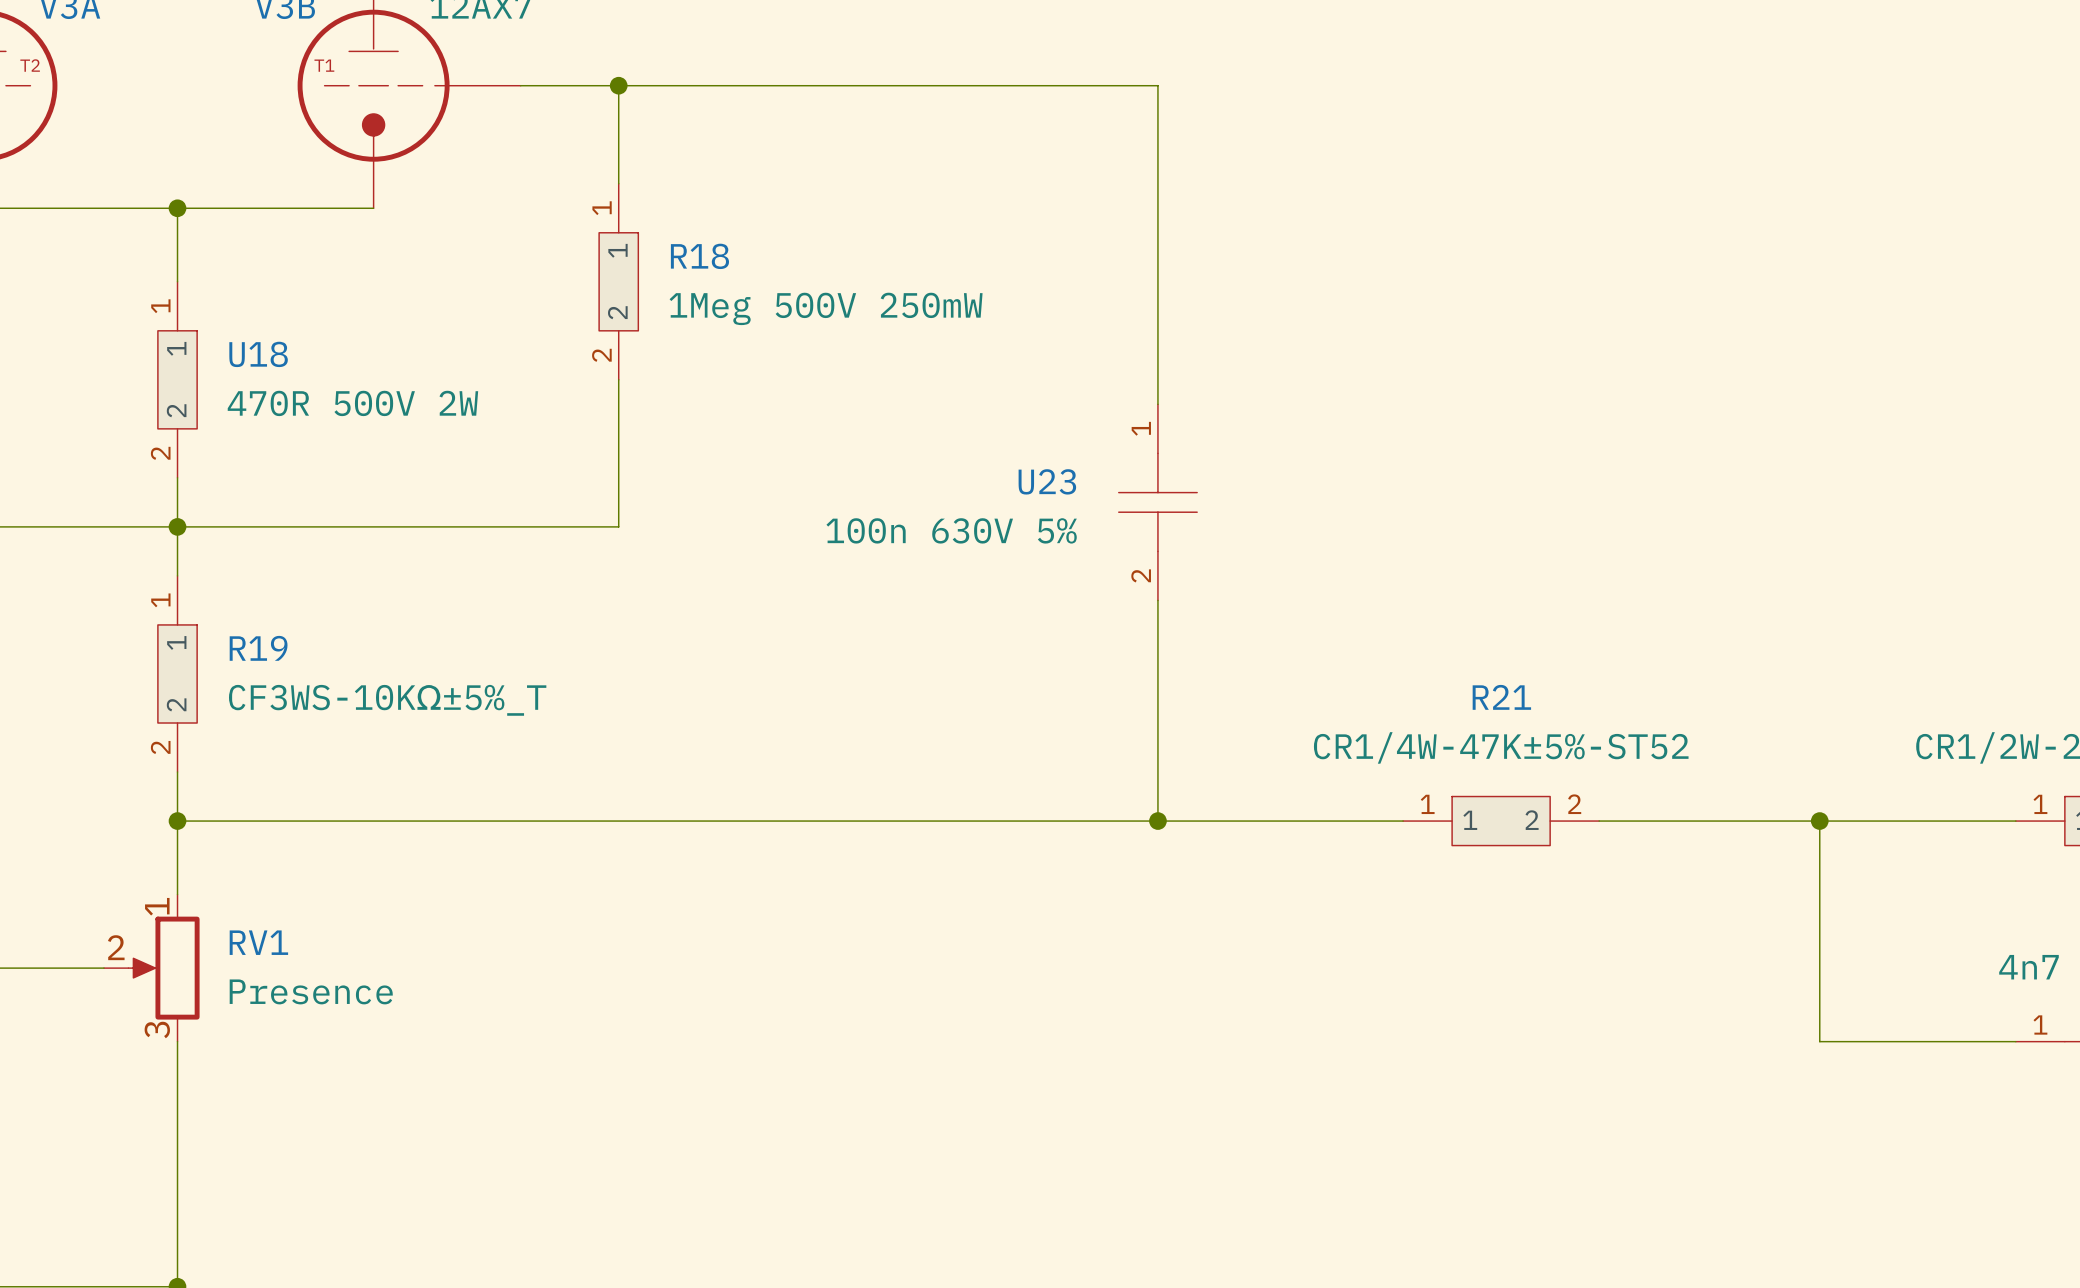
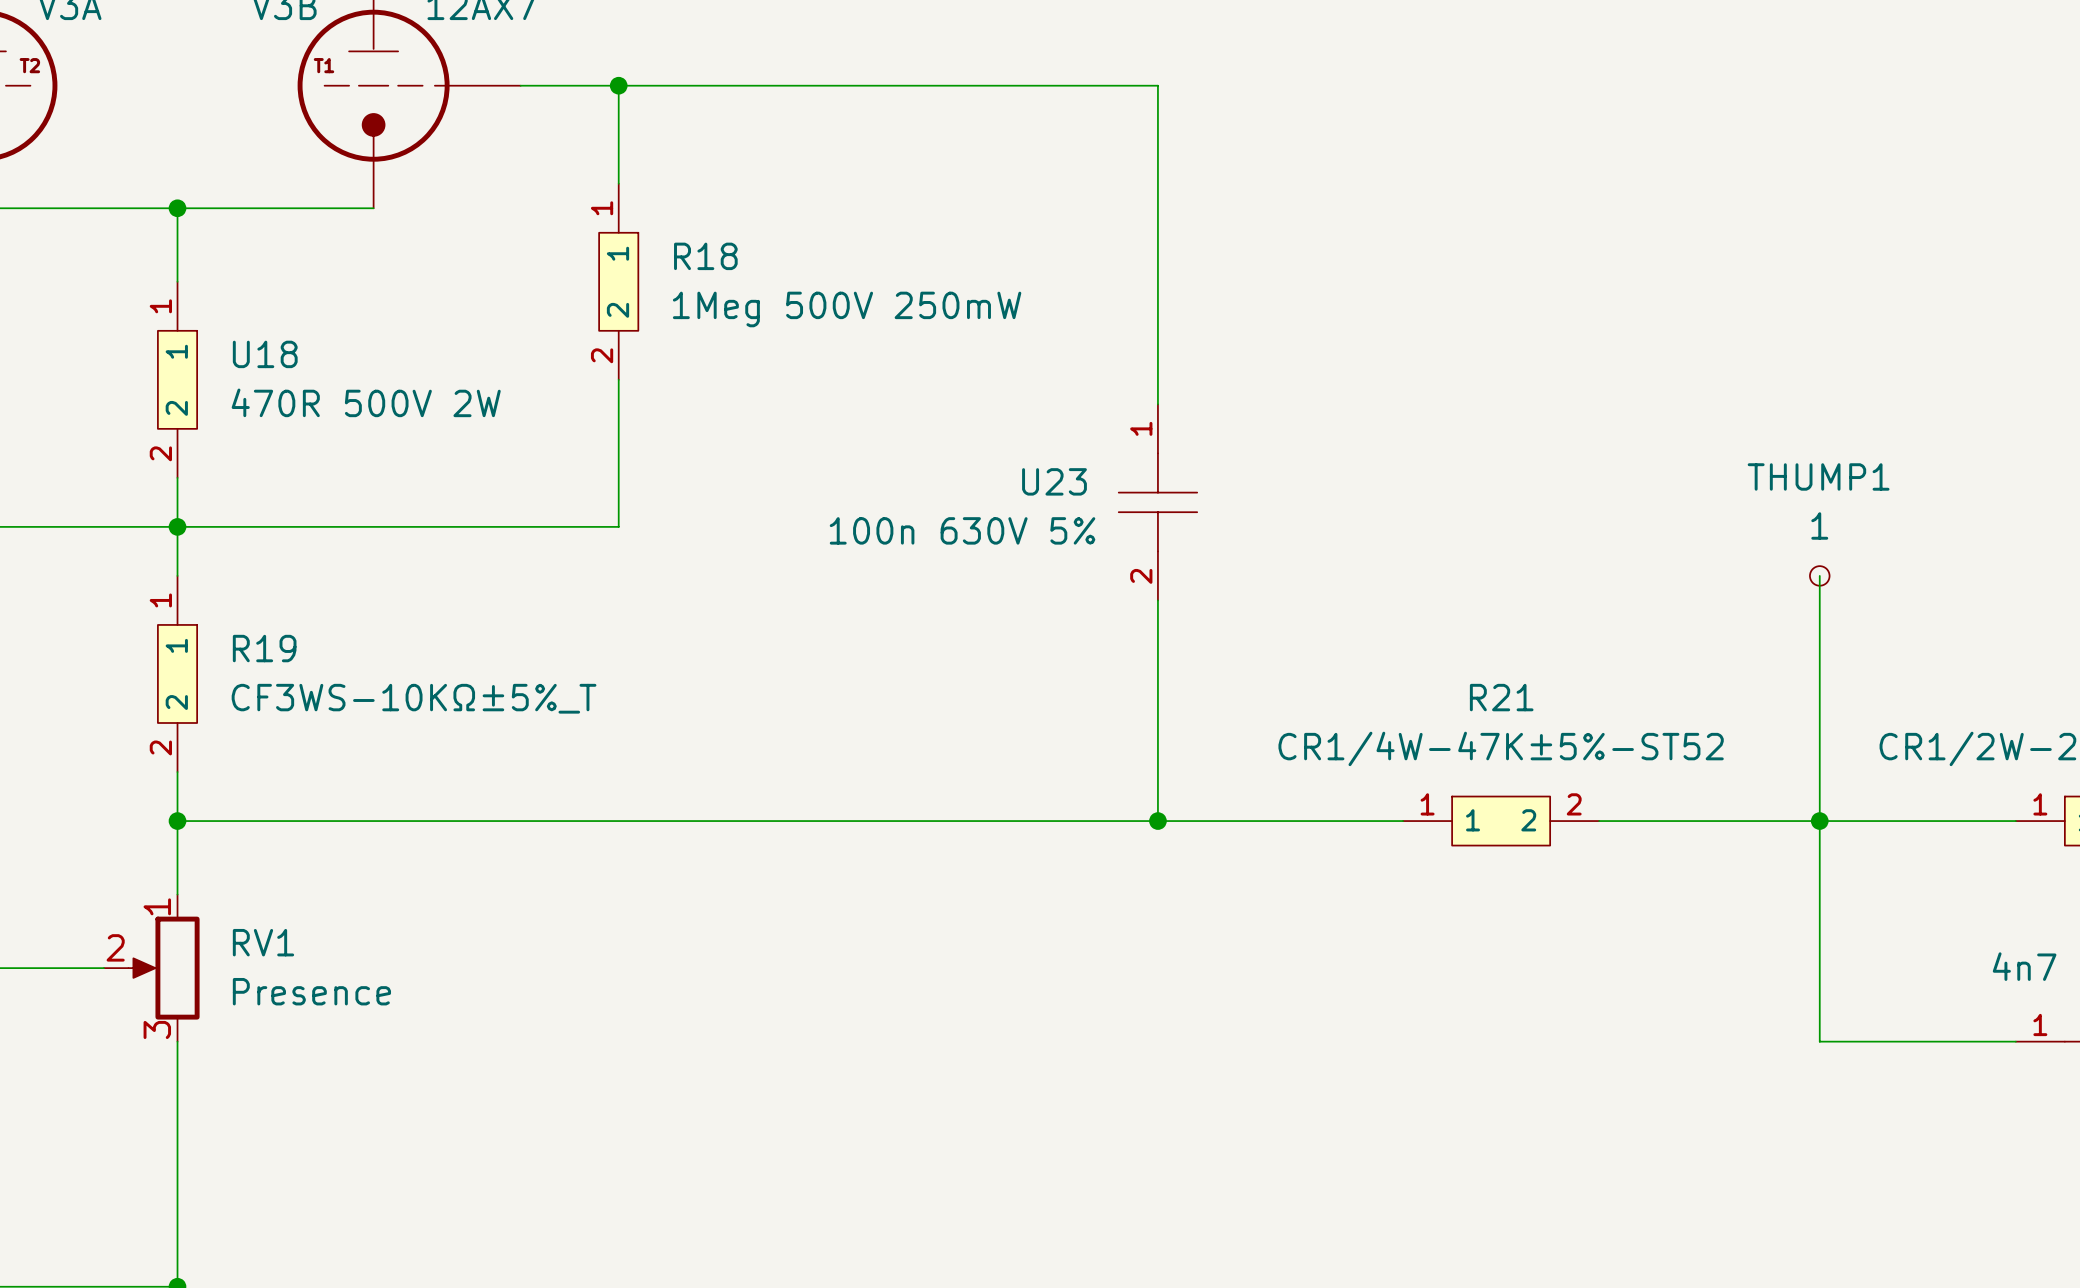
wire: none -> (1819, 575) (1819, 821)
THUMP1: none -> 1 (1819, 575)

